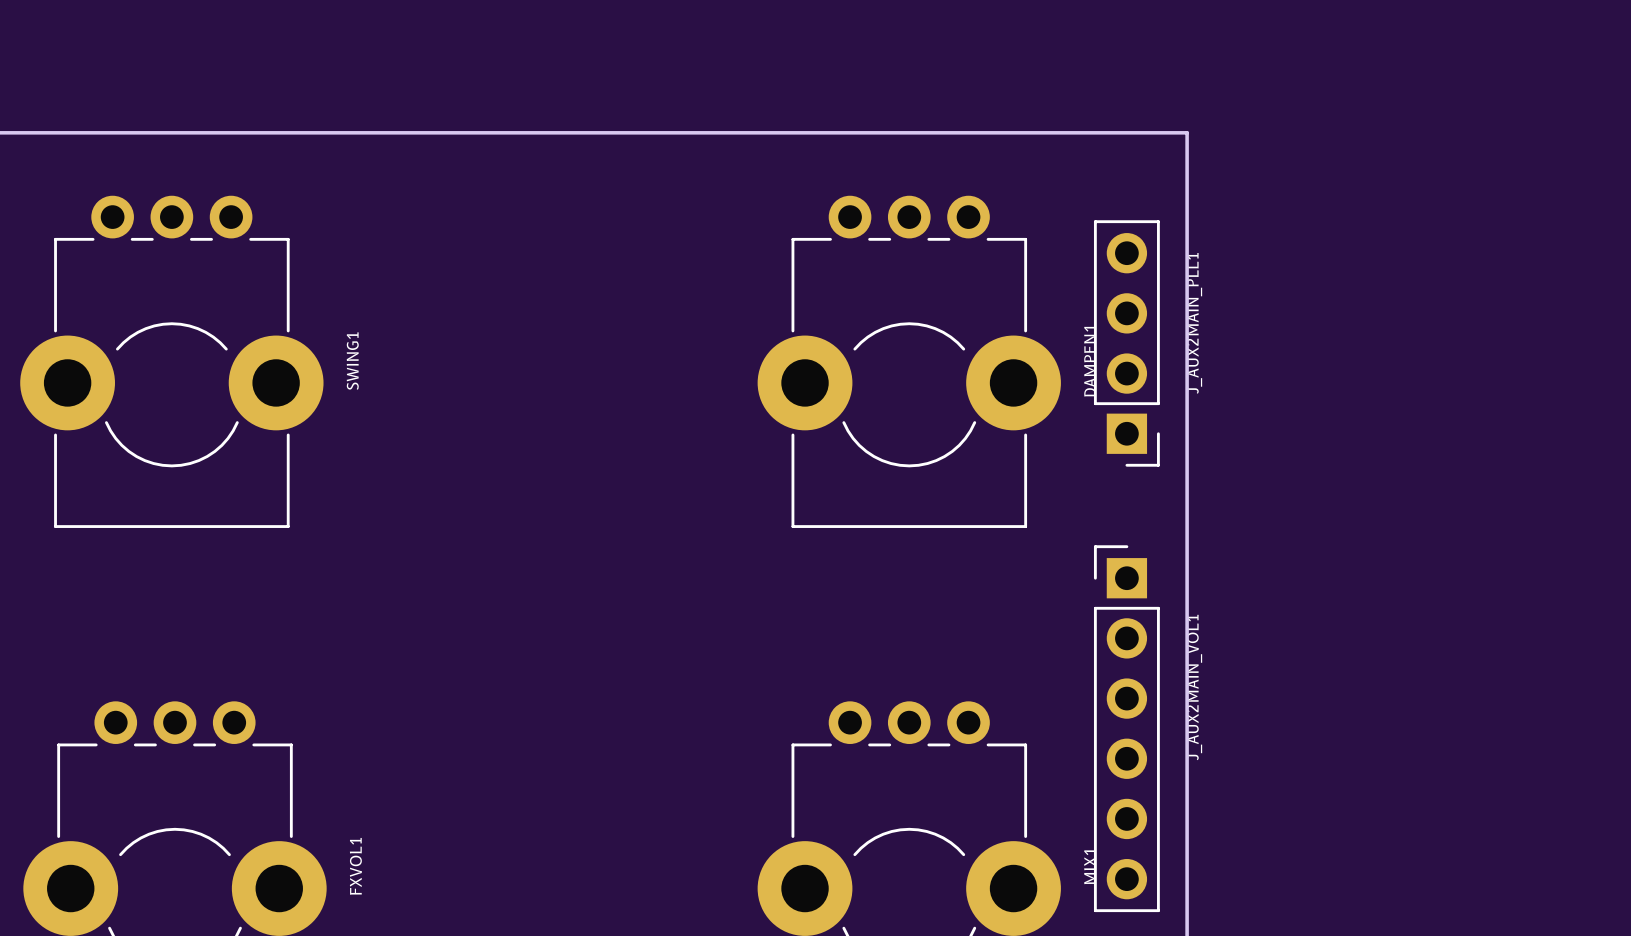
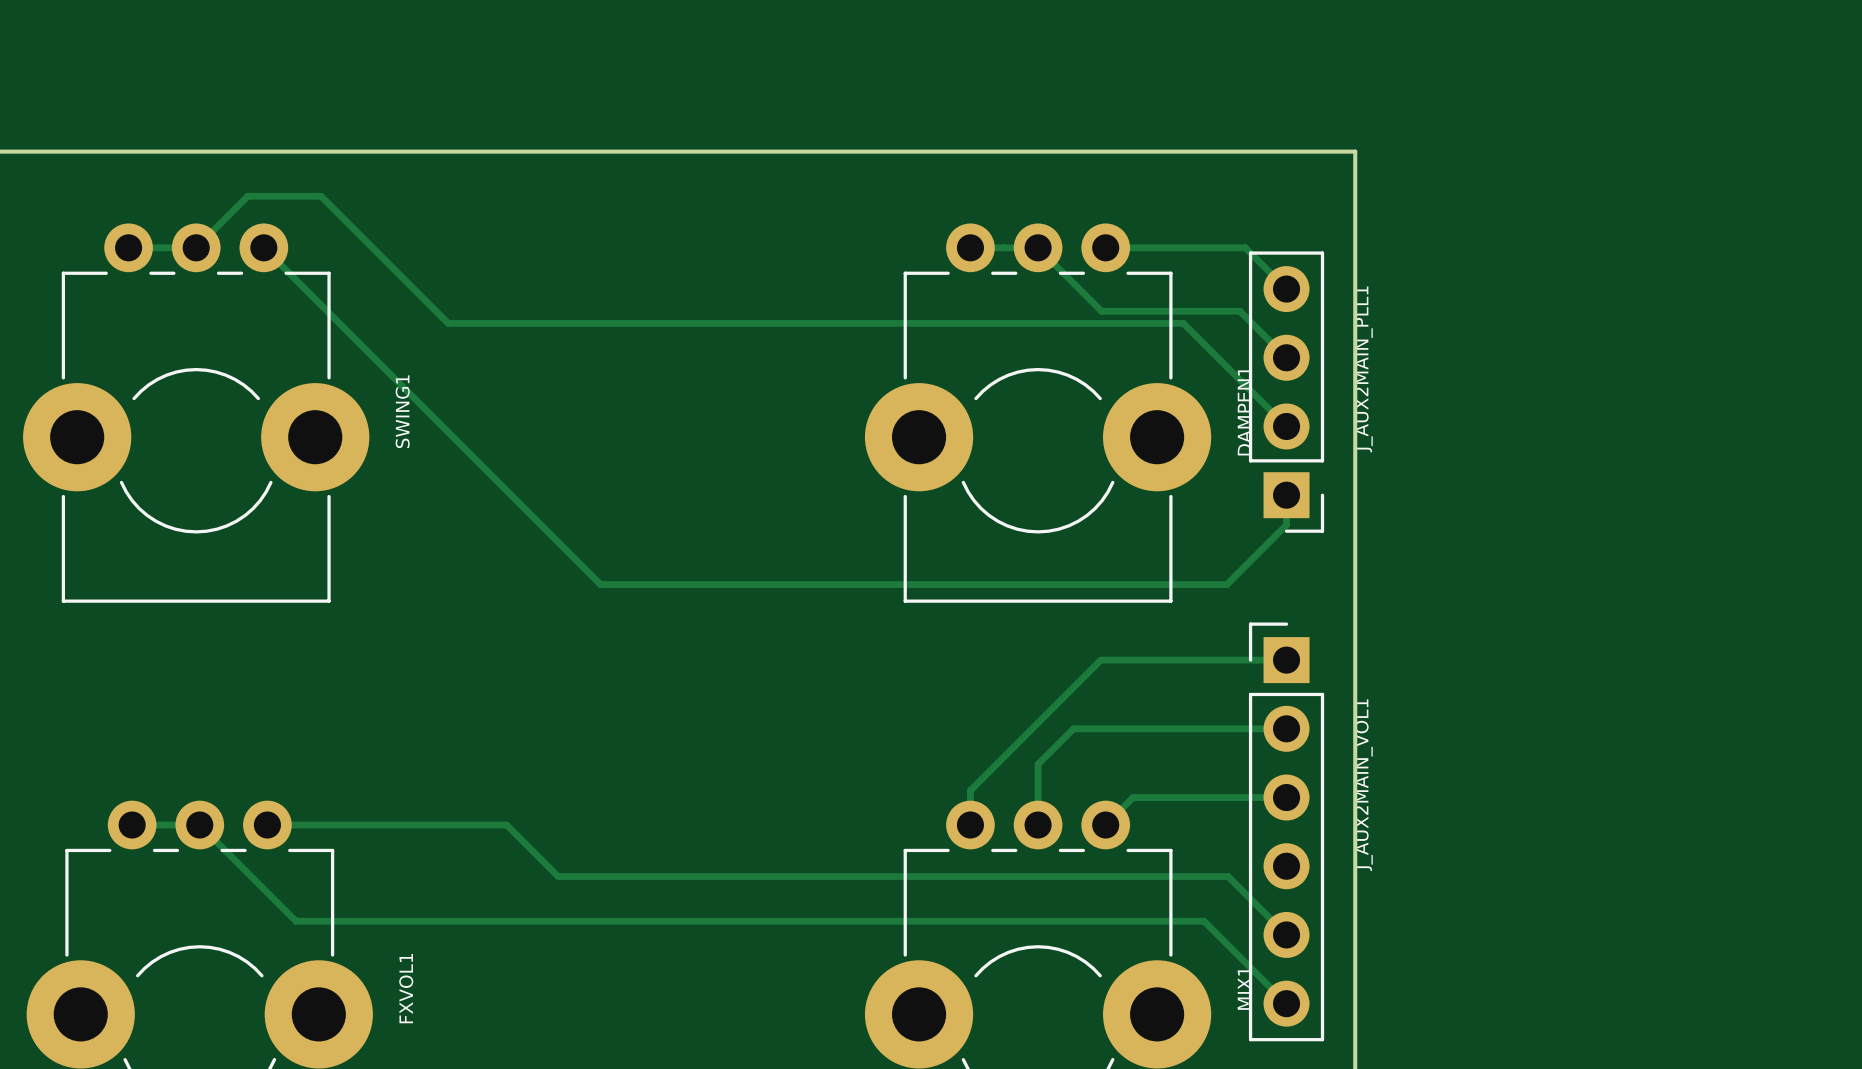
track: none -> (128, 247) (196, 247) (247, 196) (321, 196) (448, 323) (1183, 323) (1286, 426)
track: none -> (263, 247) (600, 584) (1226, 584) (1286, 524) (1286, 495)
track: none -> (970, 247) (1038, 247) (1101, 311) (1240, 311) (1286, 357)
track: none -> (1105, 247) (1245, 247) (1286, 289)
track: none -> (1286, 660) (1100, 660) (970, 790) (970, 825)
track: none -> (1286, 728) (1073, 728) (1038, 764) (1038, 825)
track: none -> (1286, 797) (1133, 797) (1105, 825)
track: none -> (132, 825) (199, 825) (295, 921) (1204, 921) (1286, 1003)
track: none -> (267, 825) (506, 825) (558, 876) (1228, 876) (1286, 934)

